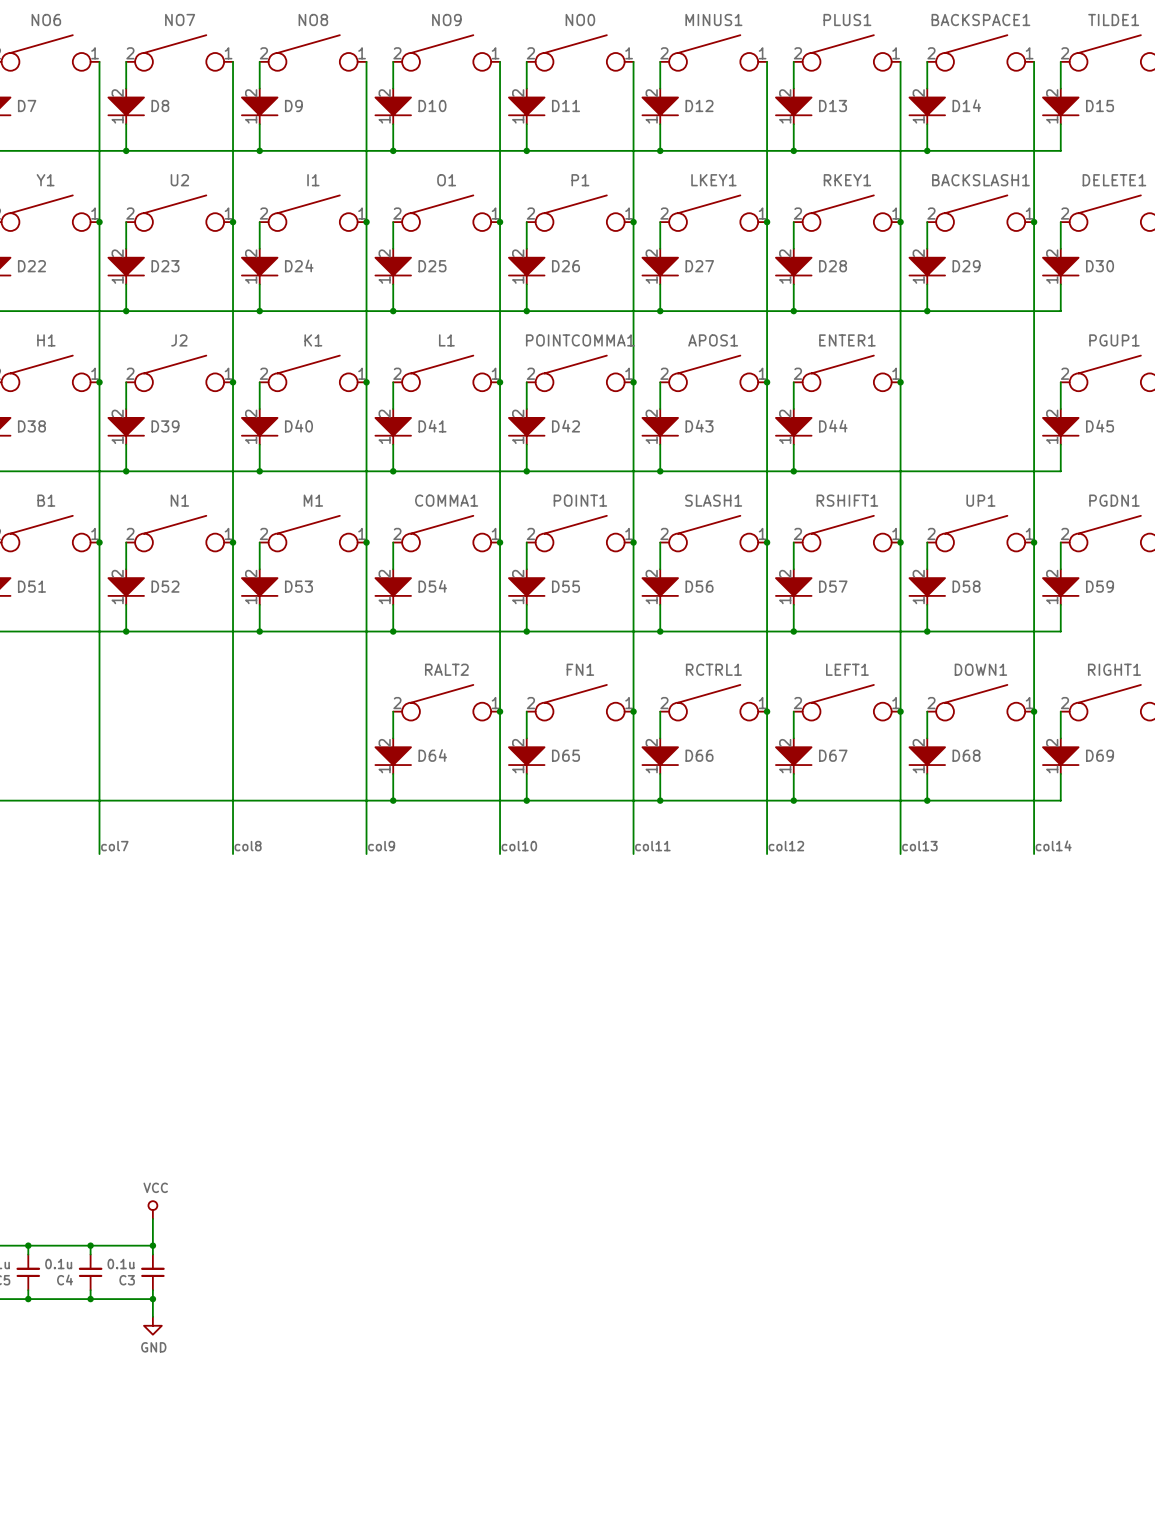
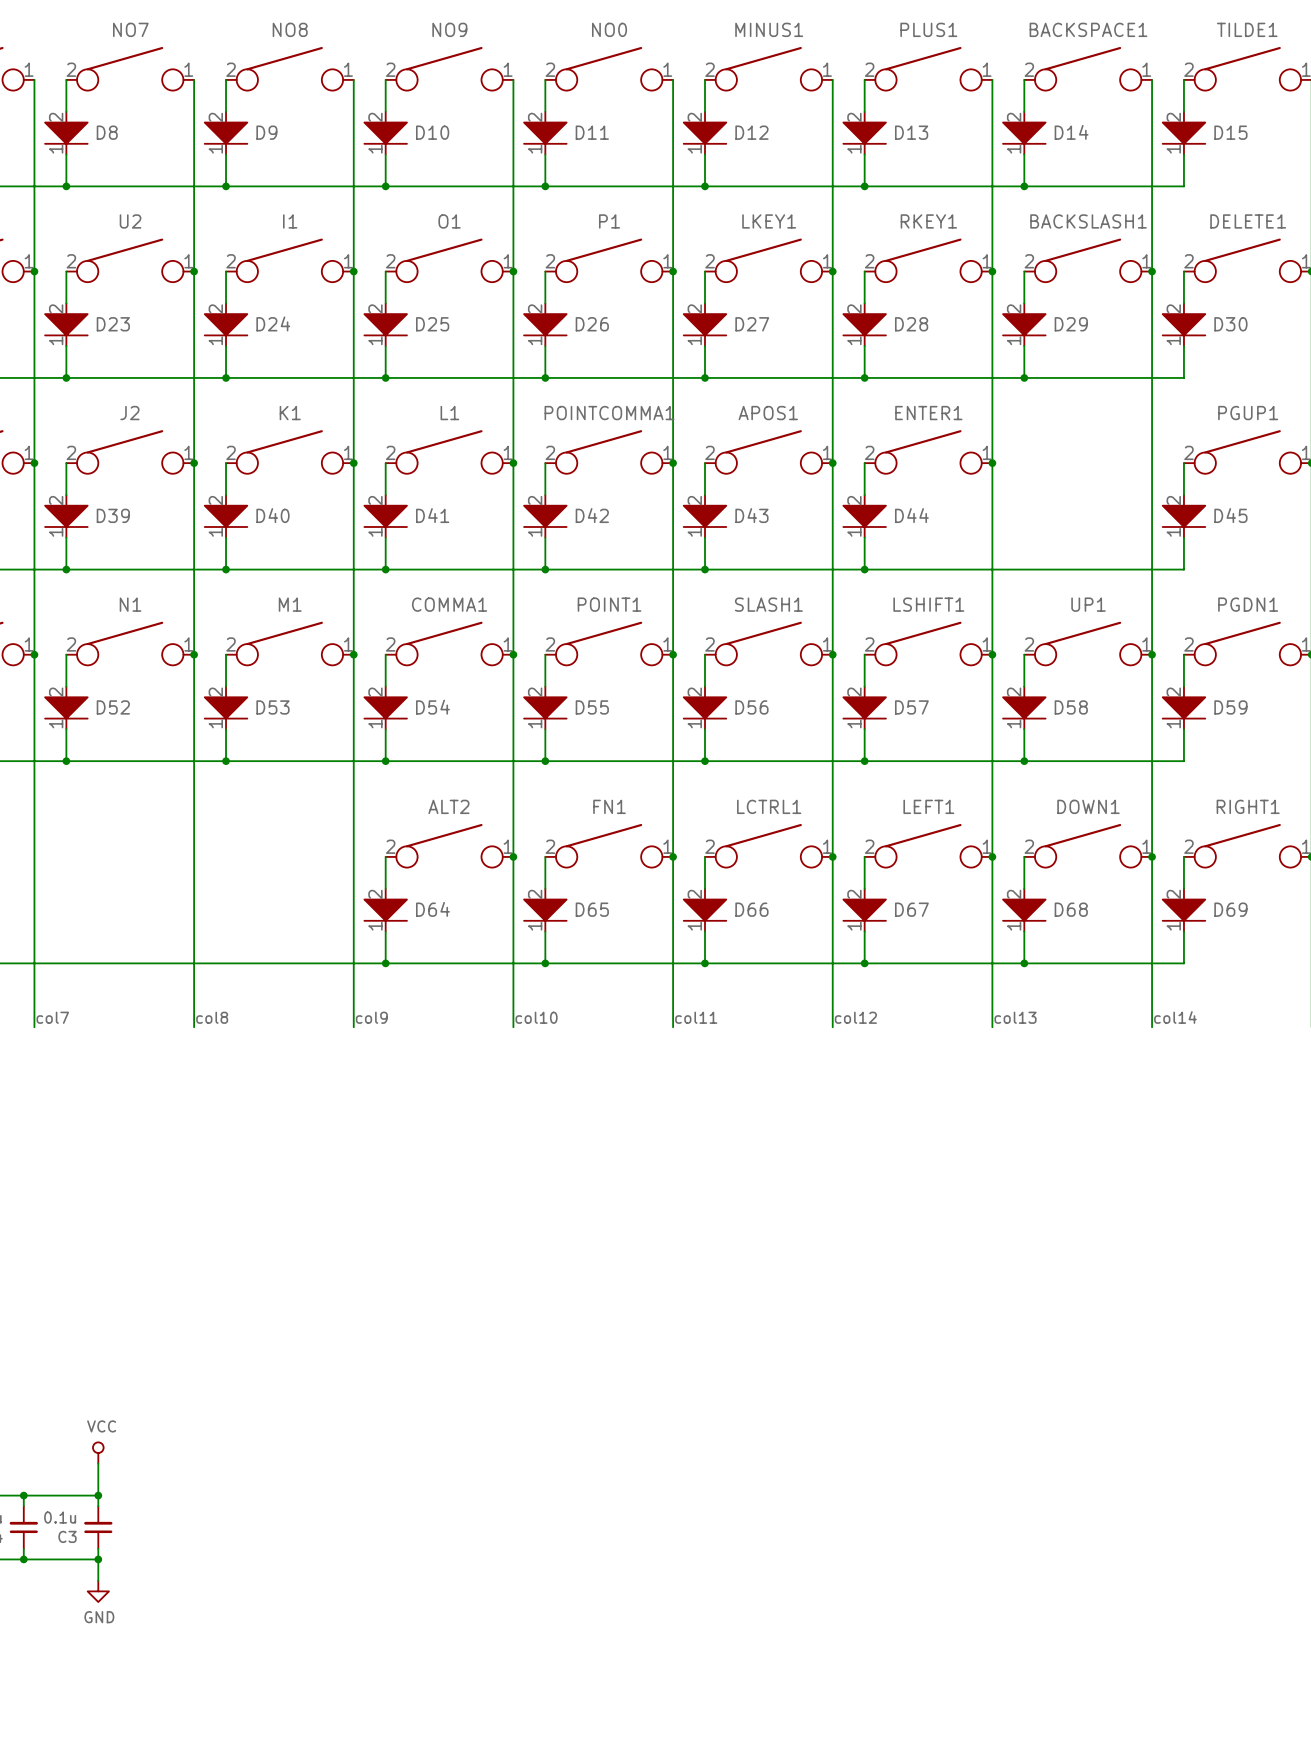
RSHIFT1 name: RSHIFT1 (847, 500) -> LSHIFT1 (928, 604)
RALT2 name: RALT2 (446, 669) -> ALT2 (448, 806)
RCTRL1 name: RCTRL1 (713, 669) -> LCTRL1 (769, 806)

